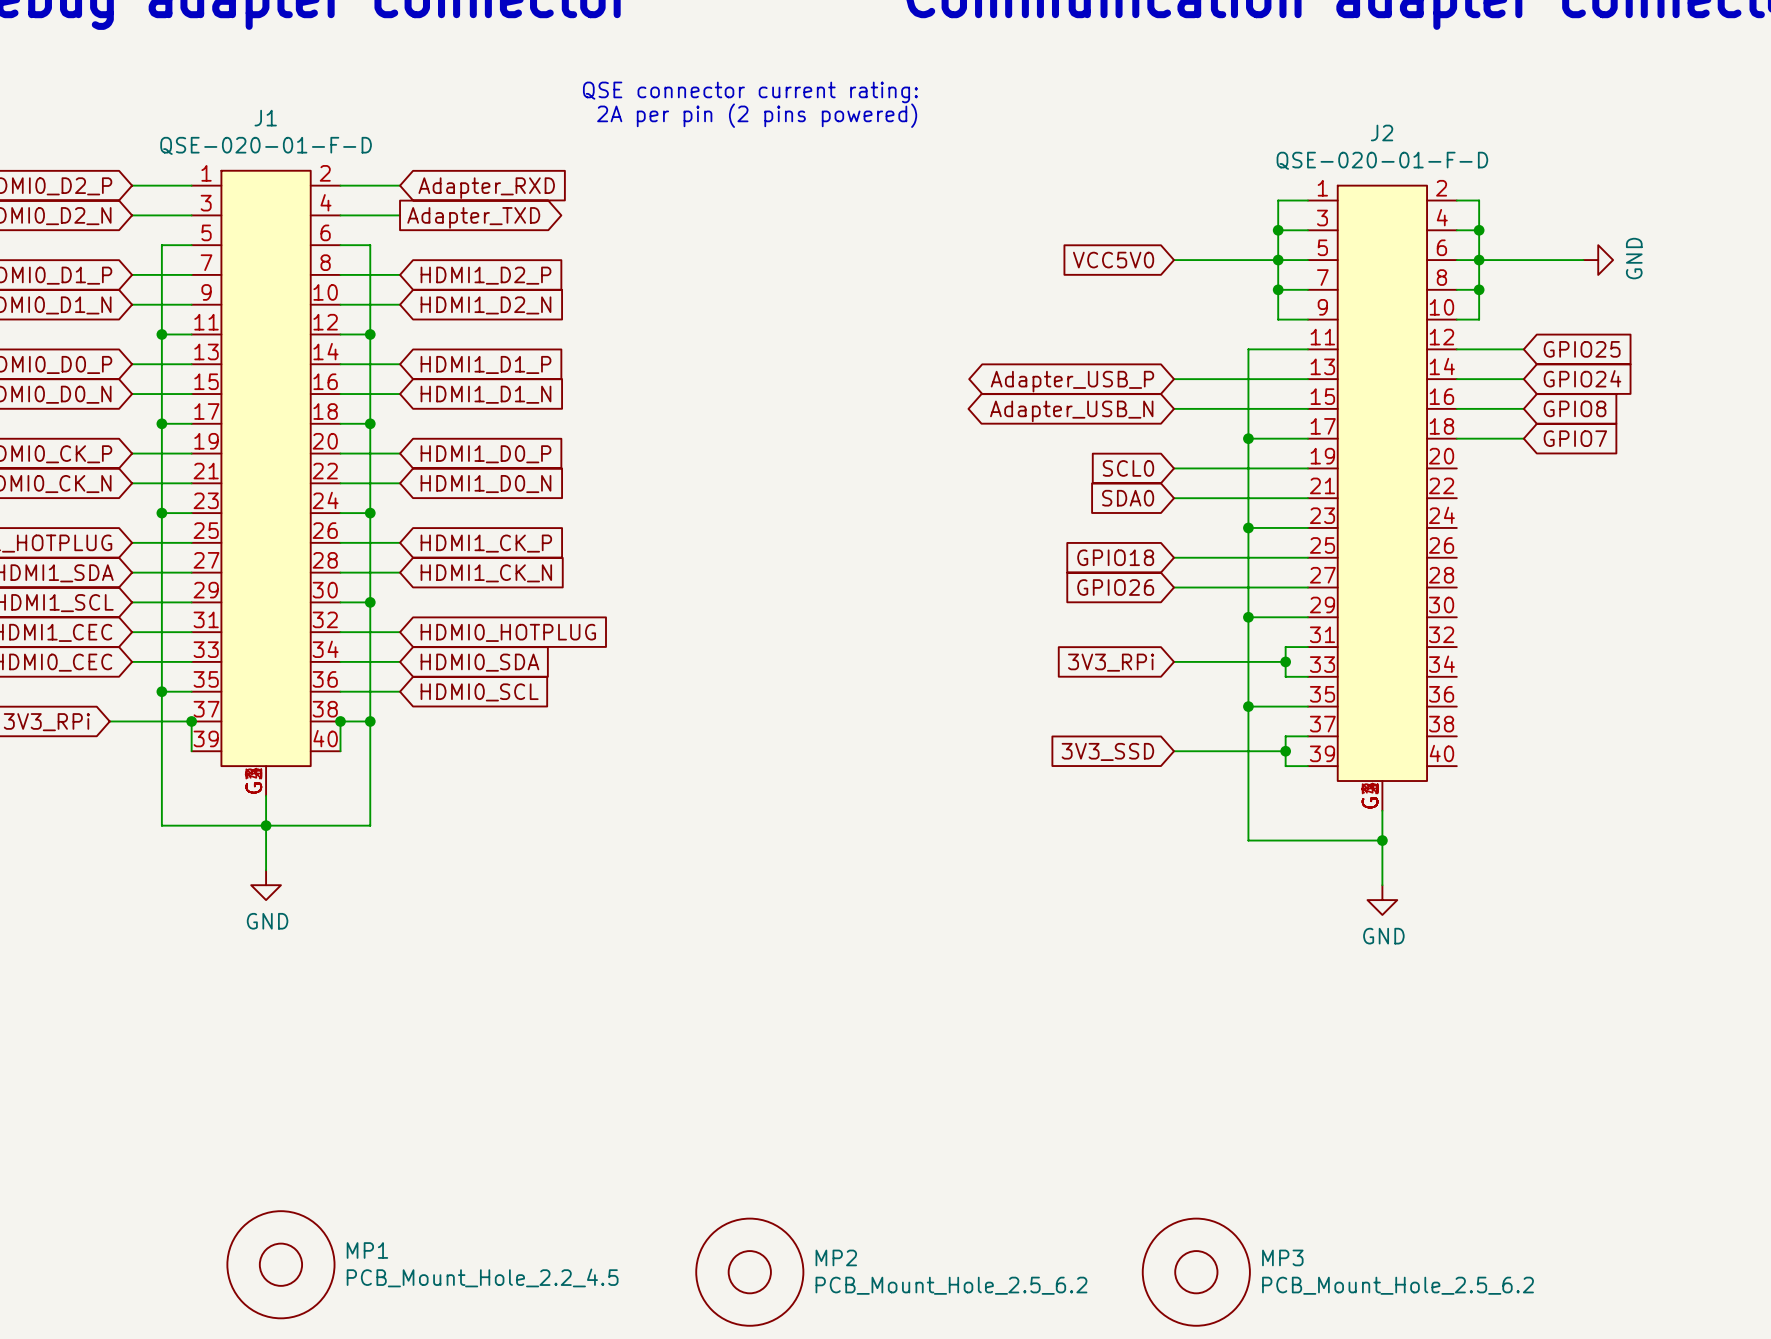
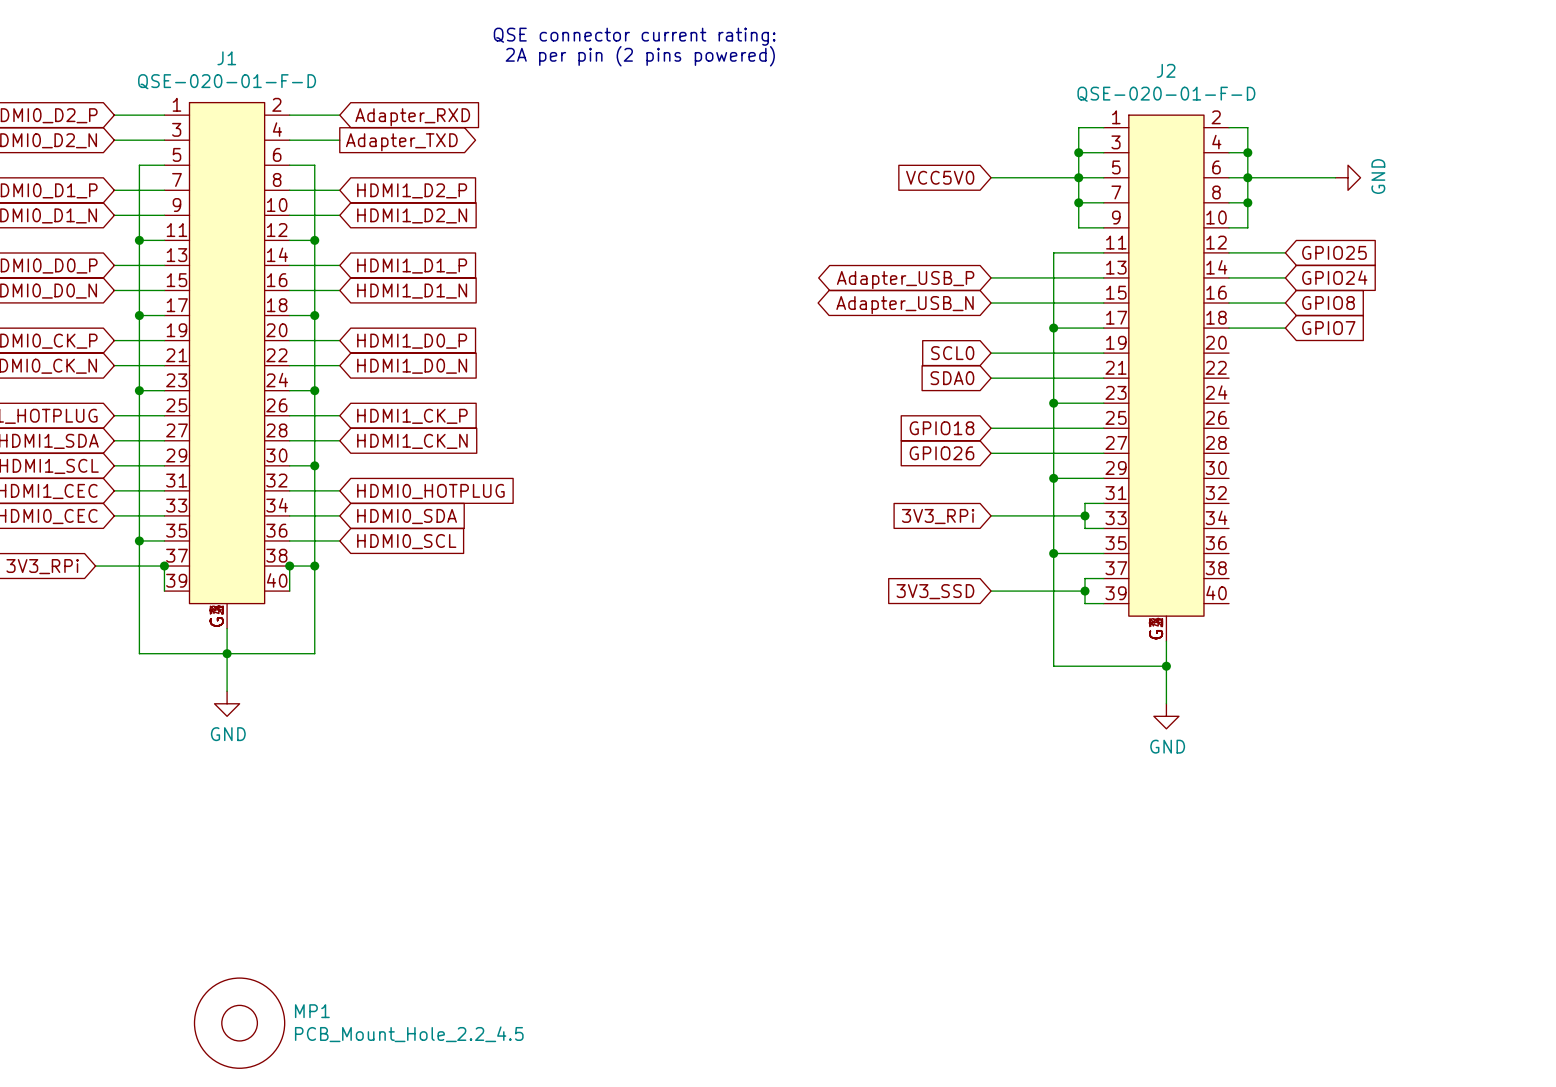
MP2: PCB_Mount_Hole_2.5_6.2 (749, 1272) -> none
MP3: PCB_Mount_Hole_2.5_6.2 (1196, 1272) -> none

